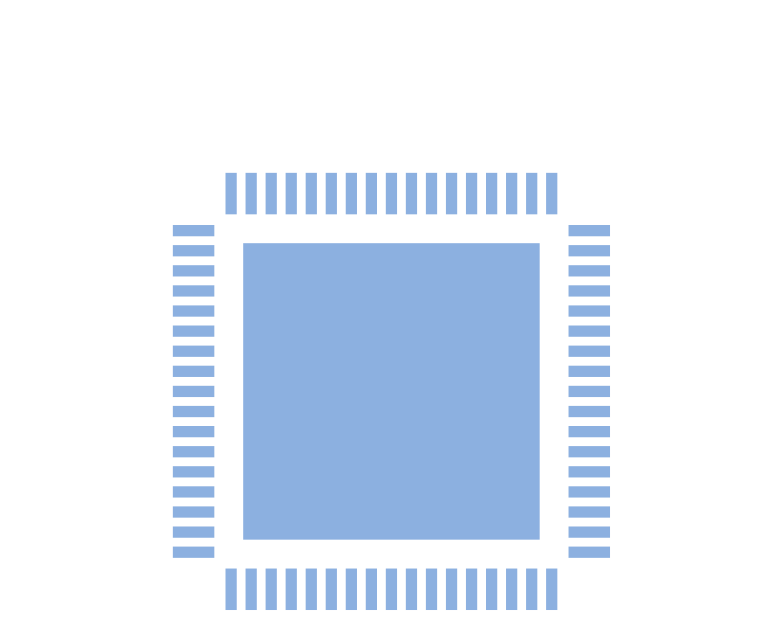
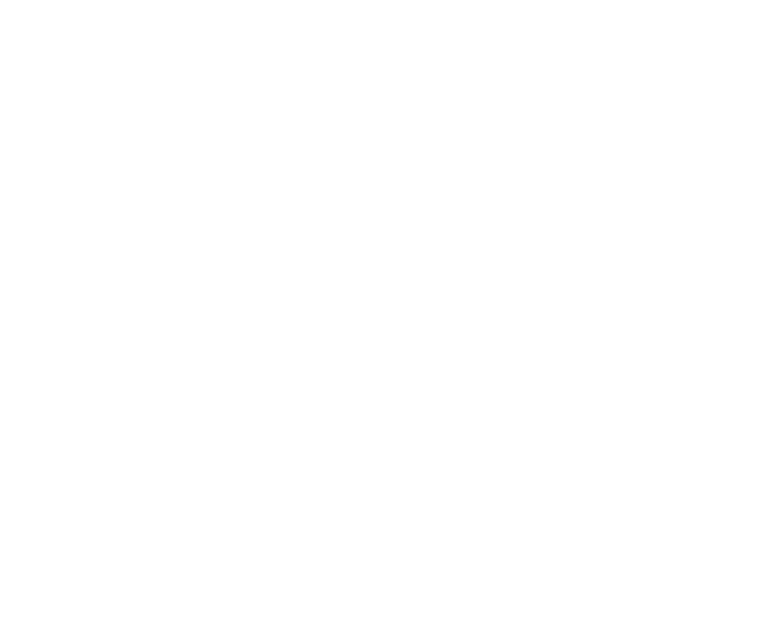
part: (391, 391) -> none

